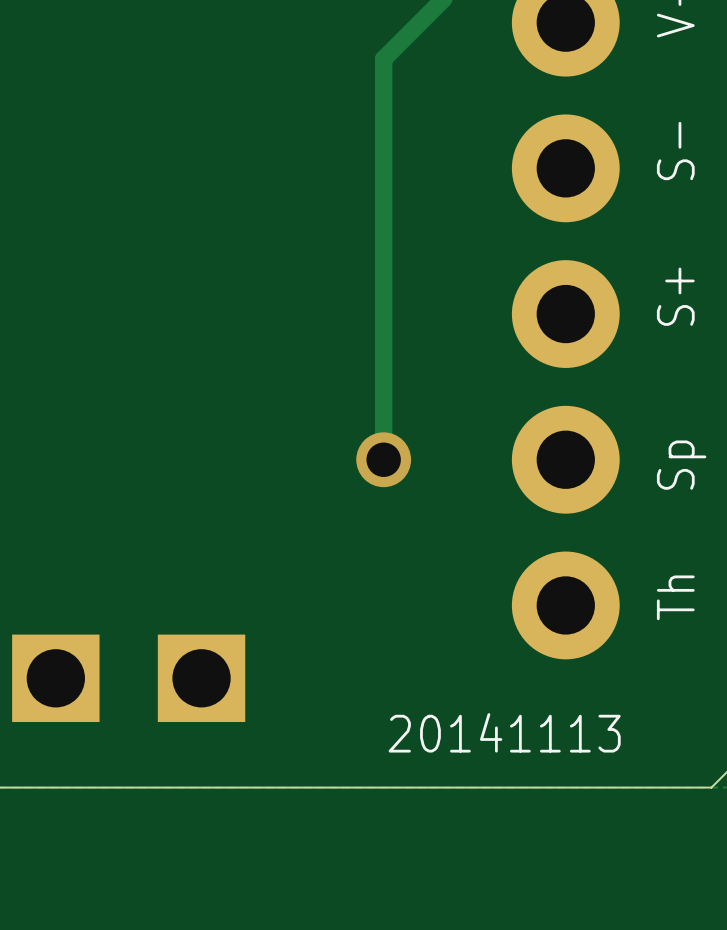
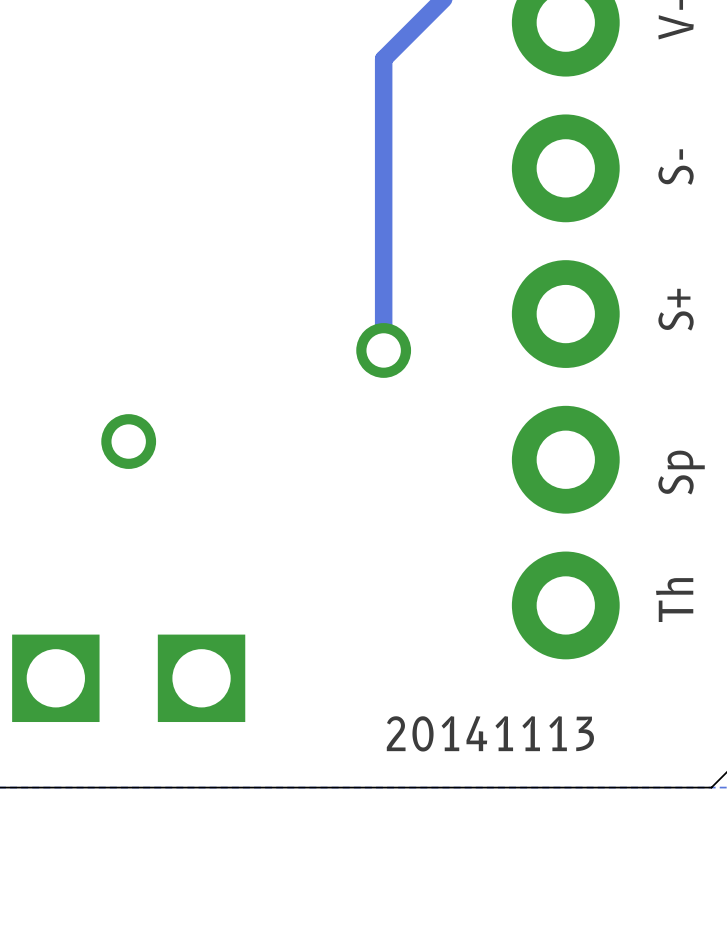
track: (383, 350) (383, 459) -> none
via: none -> (128, 441)
via position: (383, 459) -> (383, 350)

